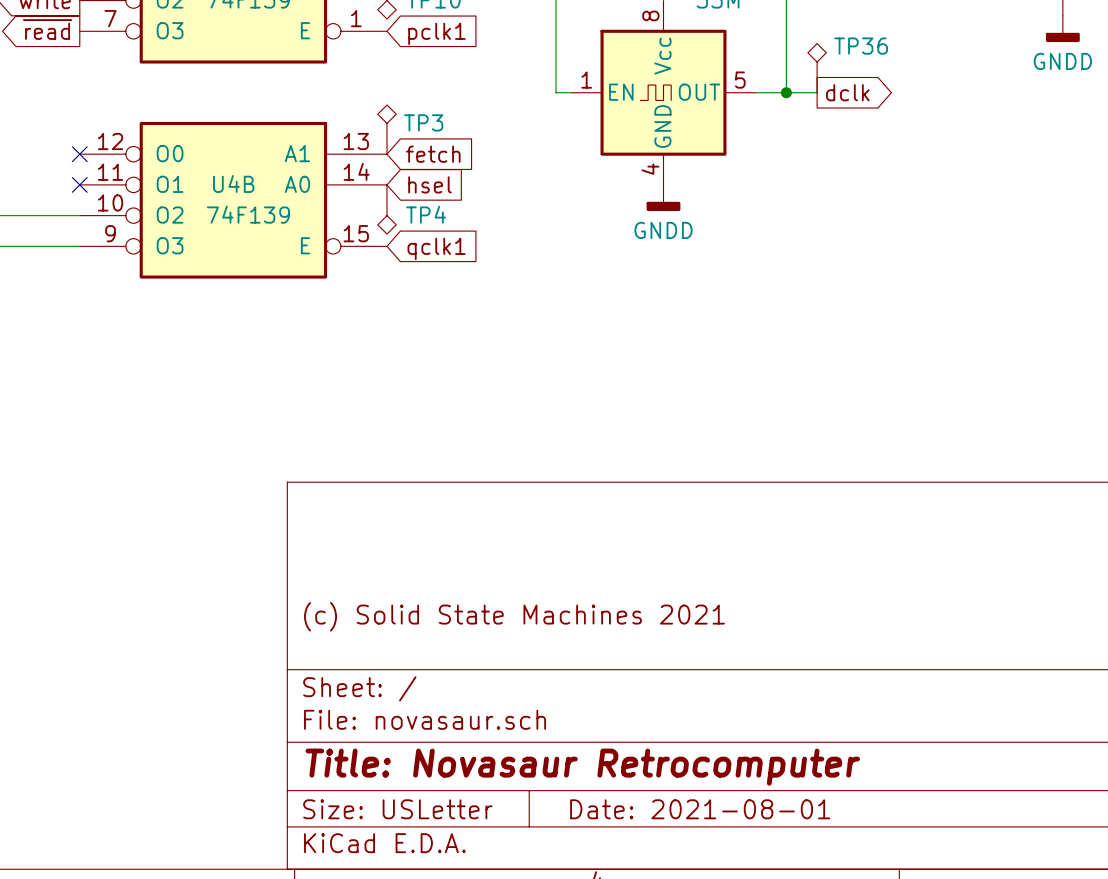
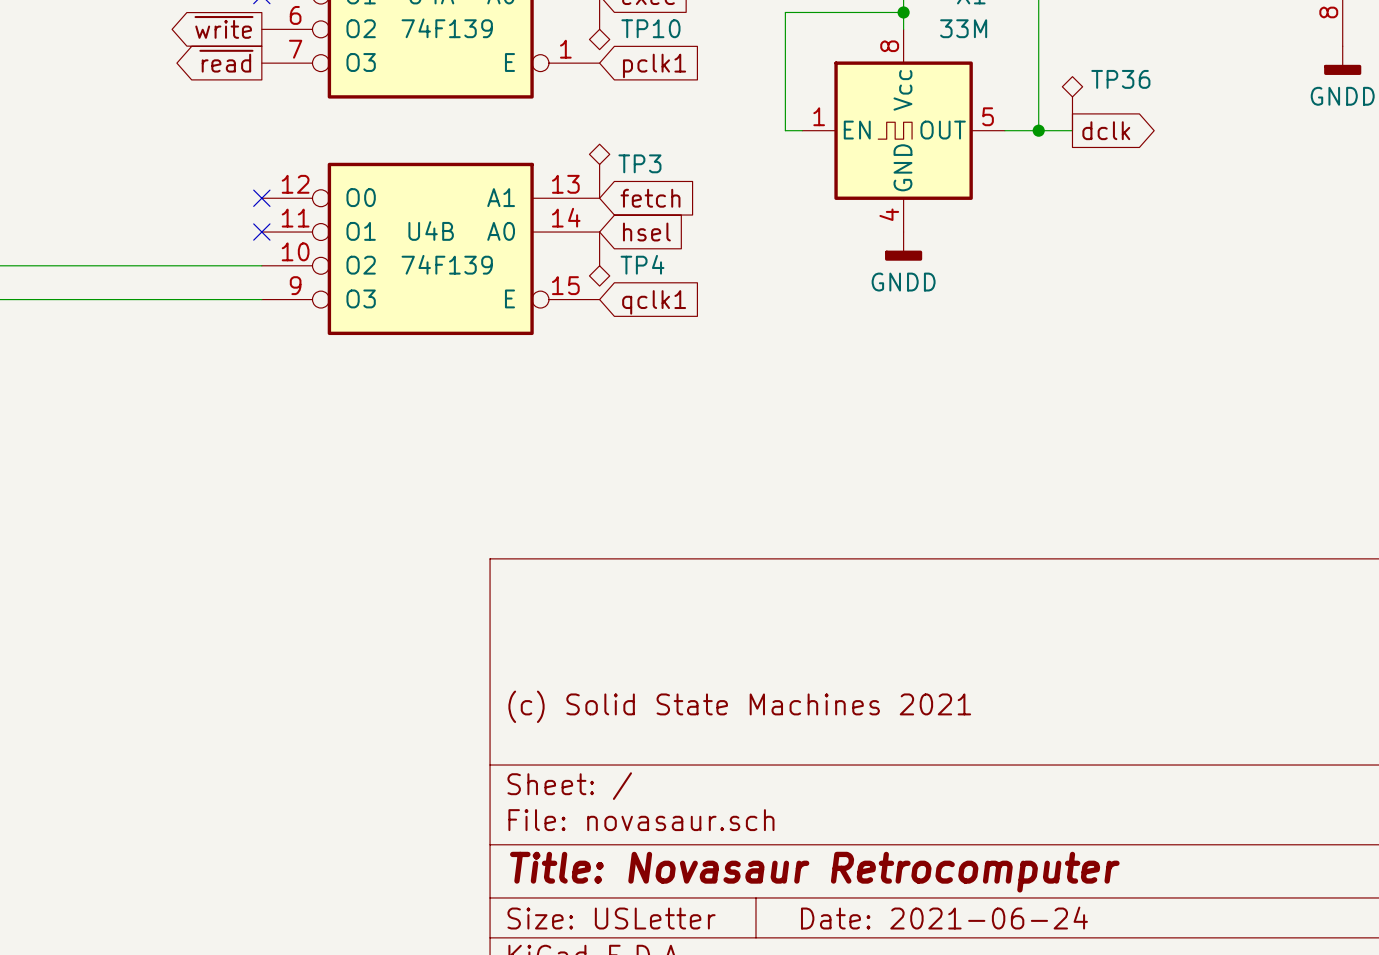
title block: Date: 2021-08-01 (700, 809) -> Date: 2021-06-24 (944, 918)

